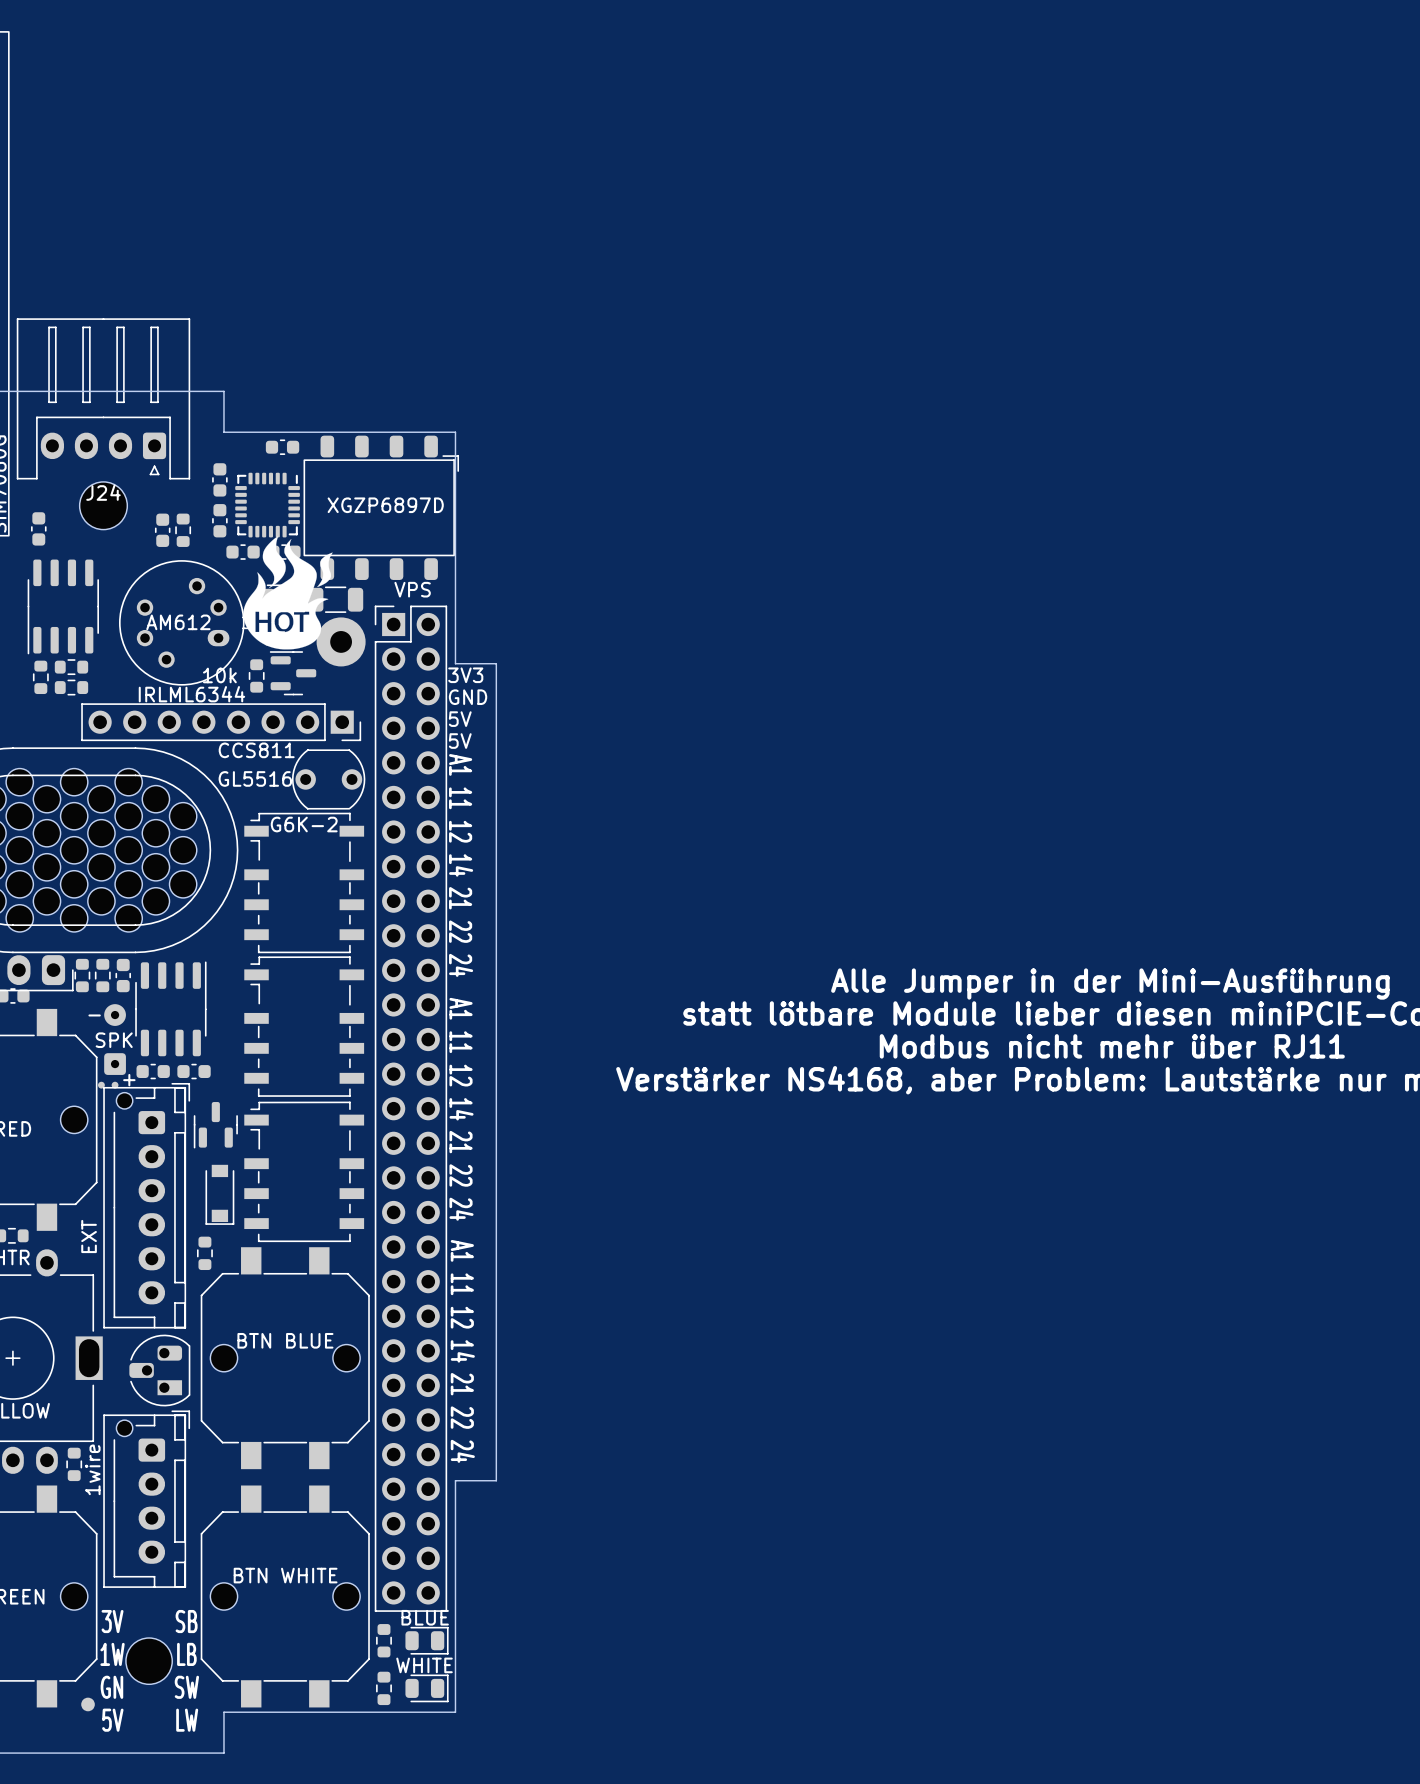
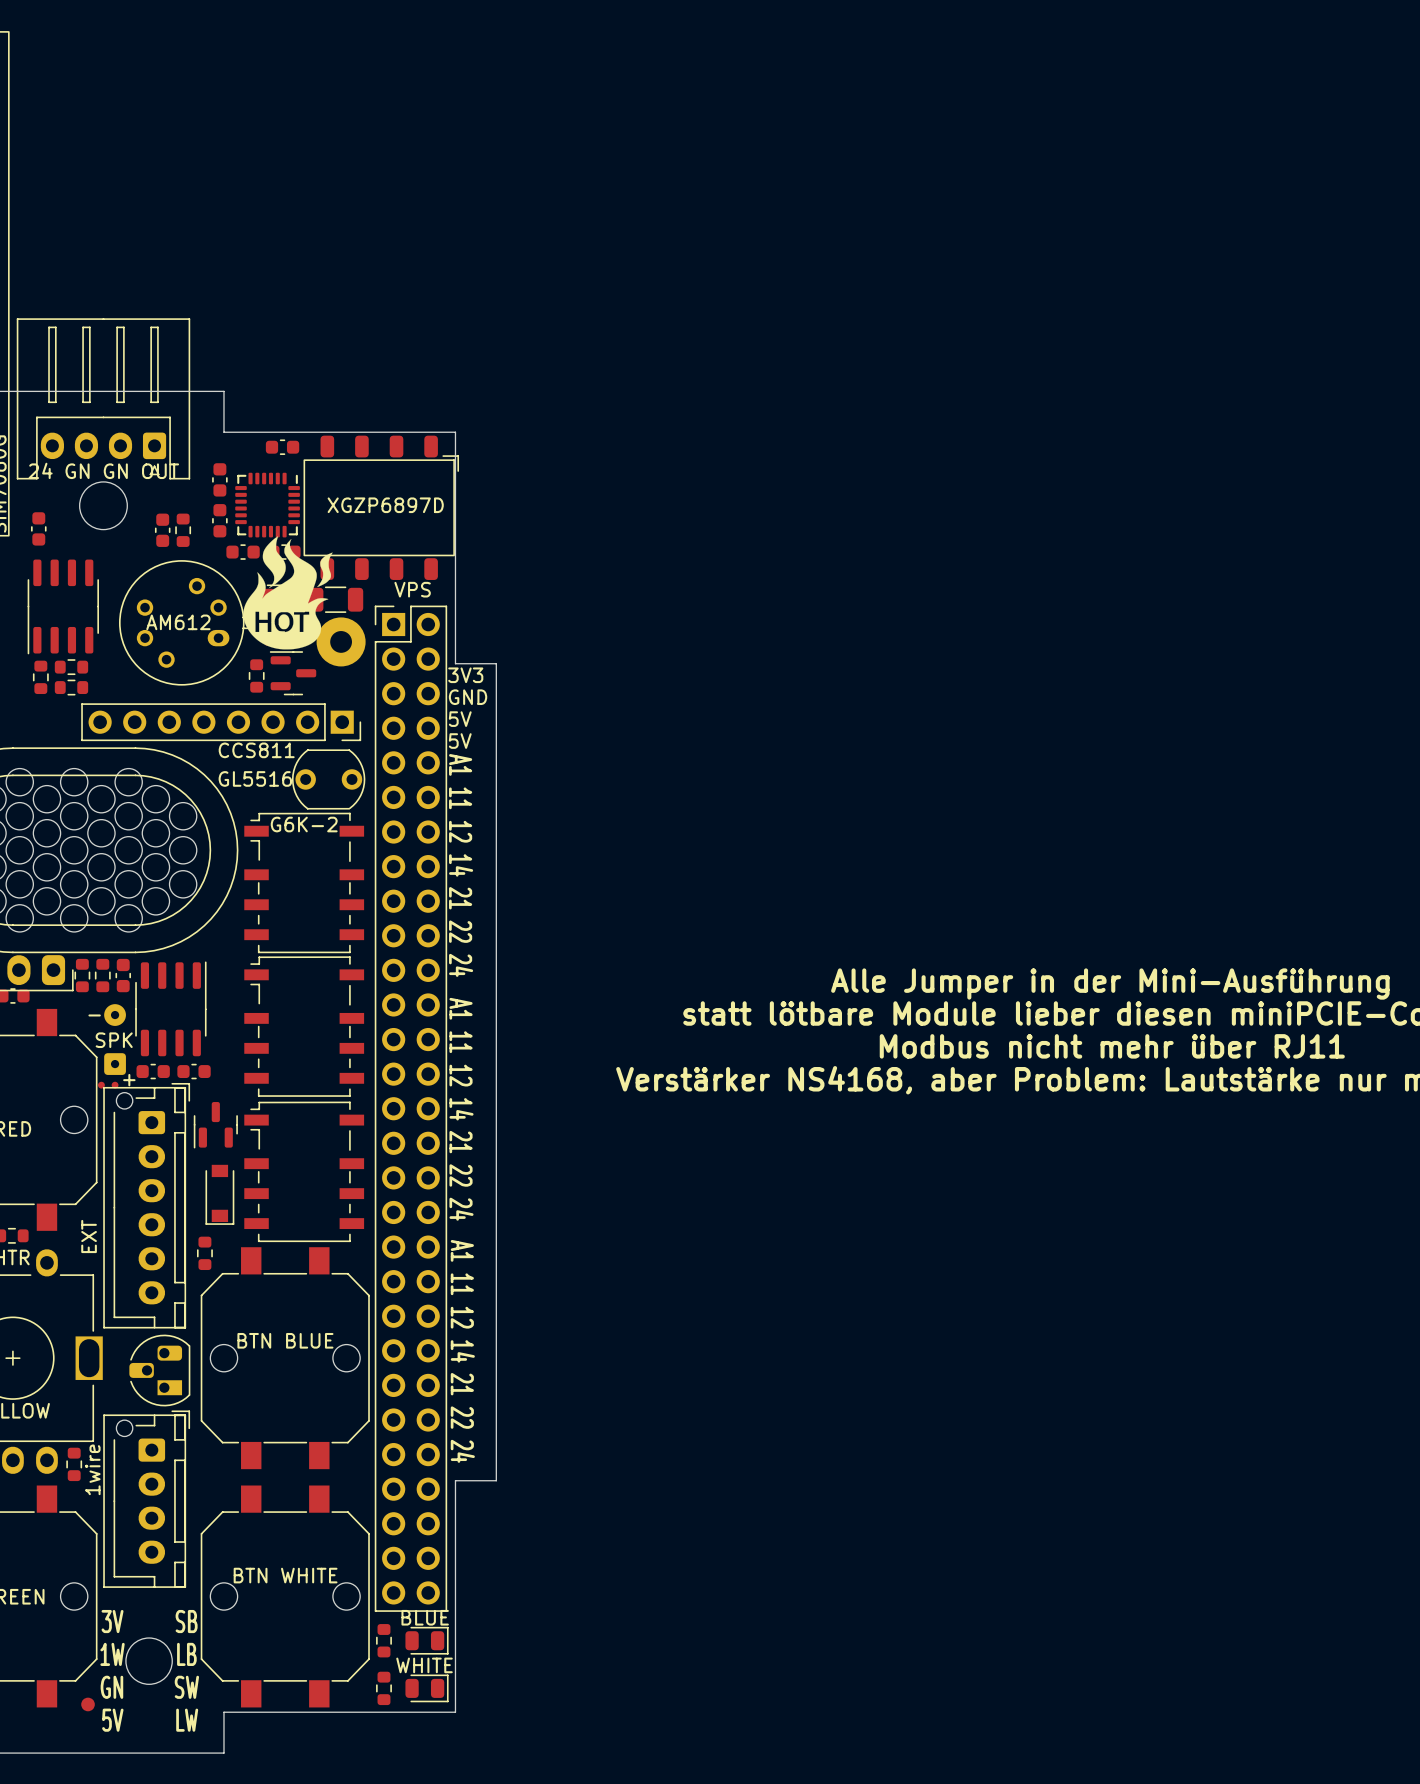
J24 value: none -> 24 GN GN OUT (103, 470)
J24 name: J24 (103, 492) -> none
part value: 10k (219, 675) -> none
part value: IRLML6344 (191, 694) -> none

